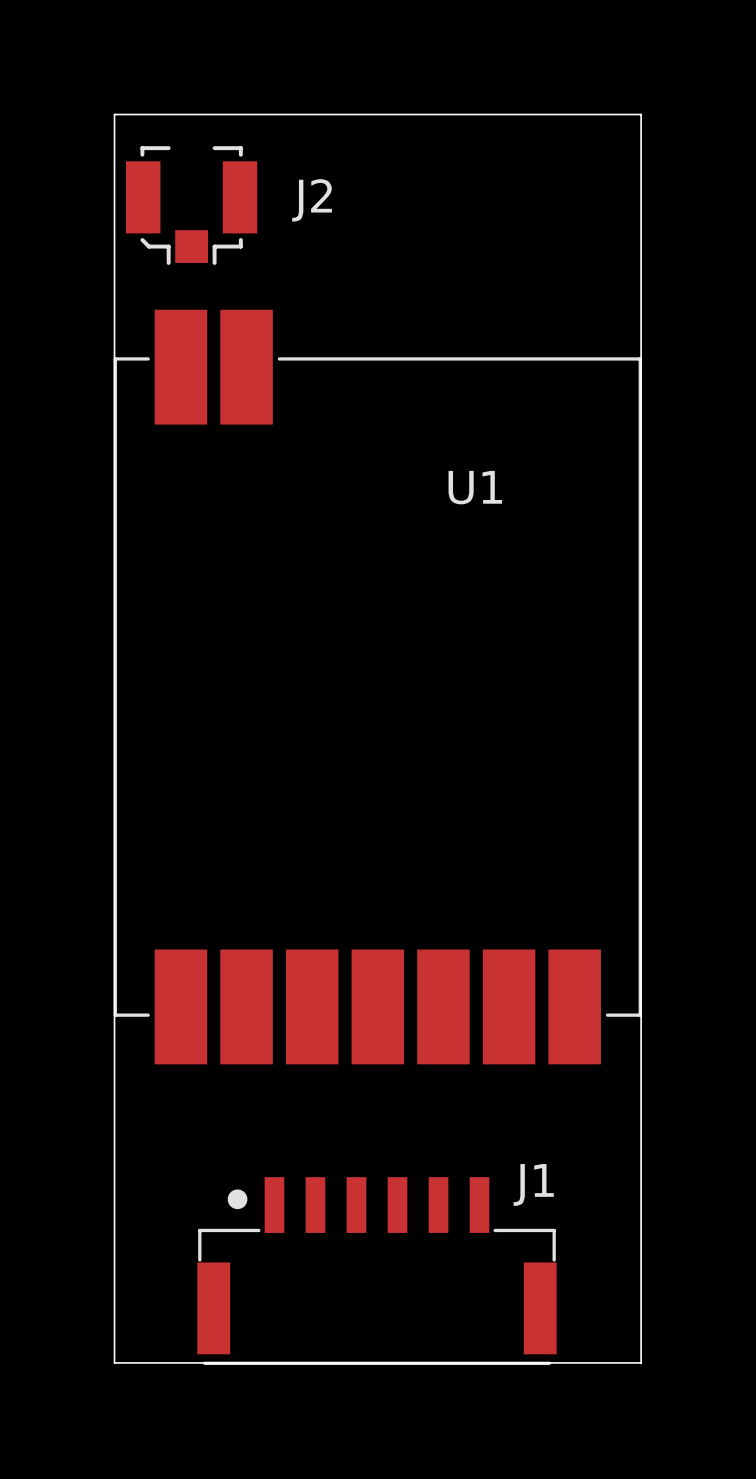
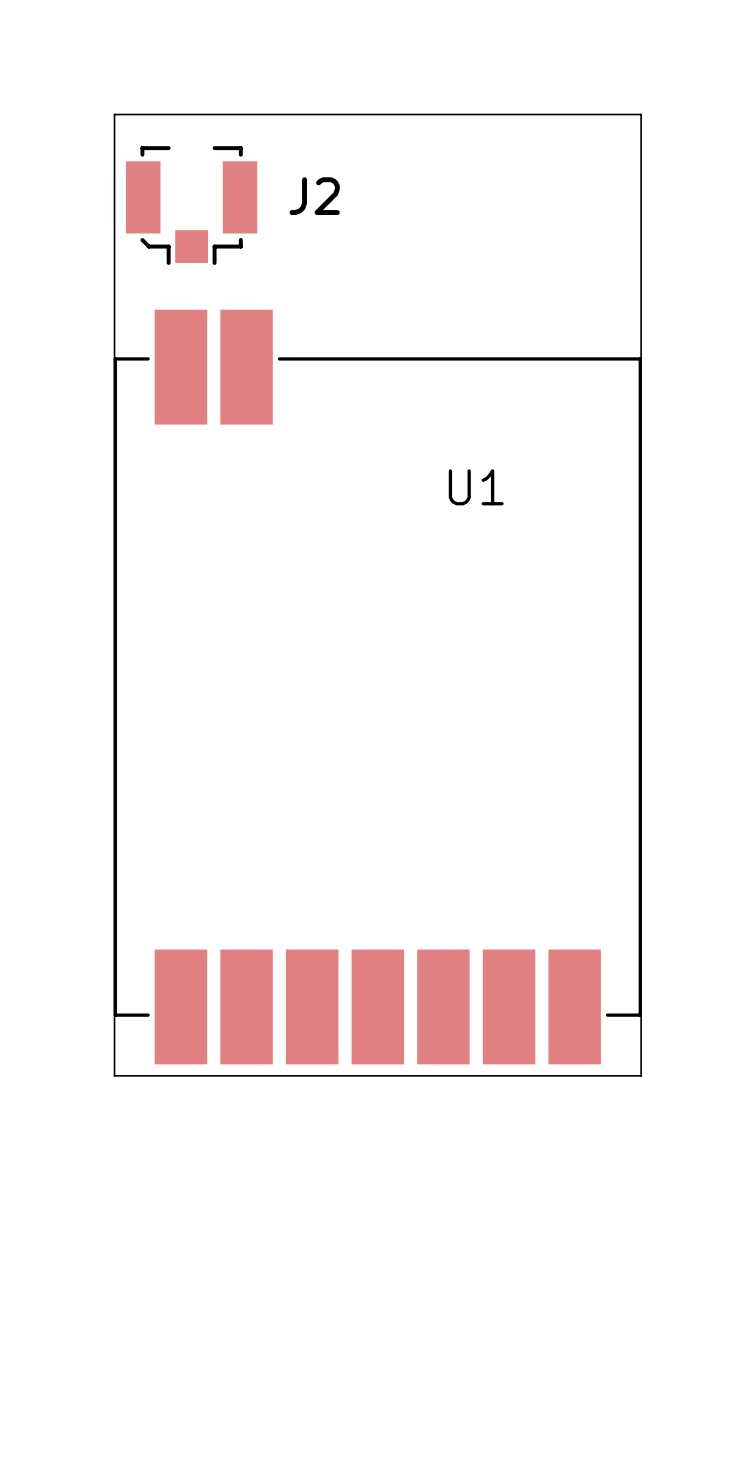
board edge: (114, 1075) (114, 1362) (641, 1362) (641, 1075) -> (114, 1075) (641, 1075)
J1: (376, 1271) -> none

